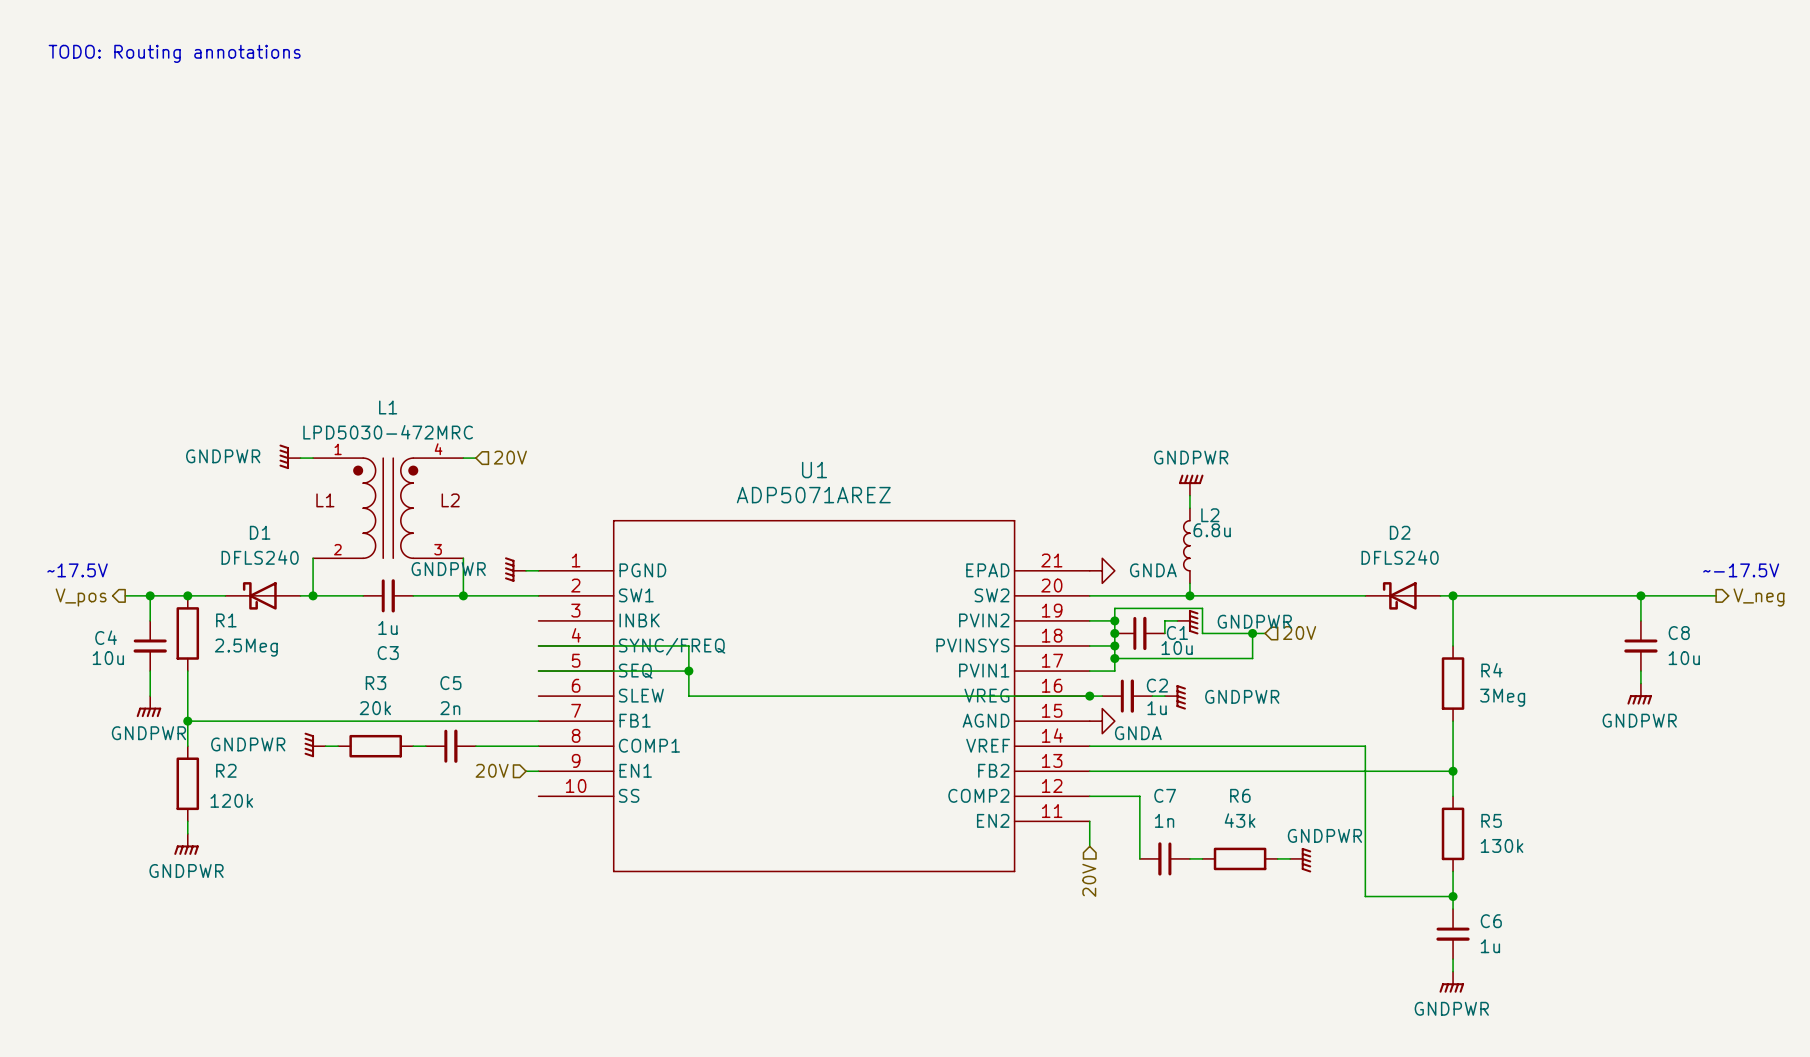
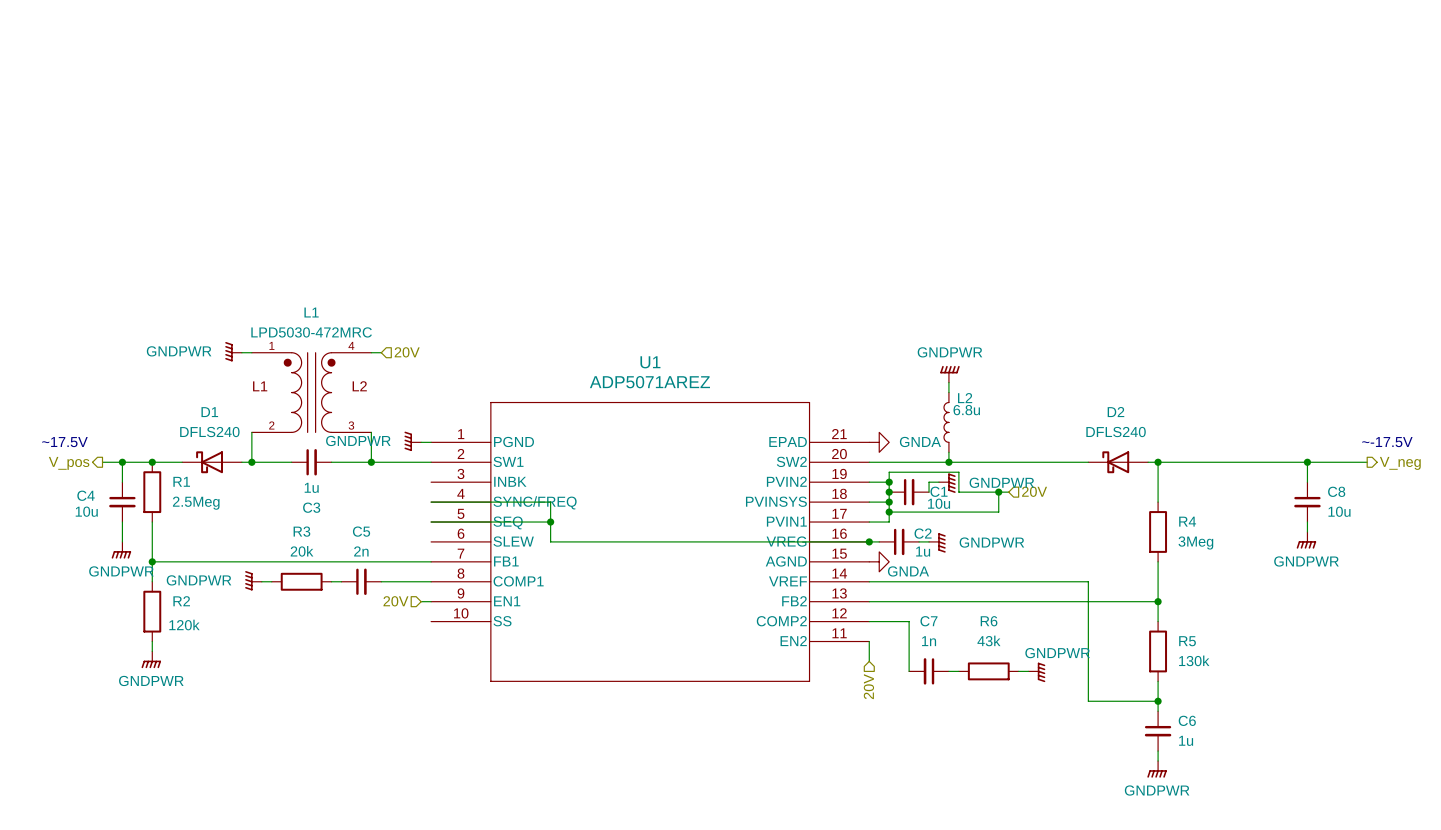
text: TODO: Routing annotations (174, 53) -> none

